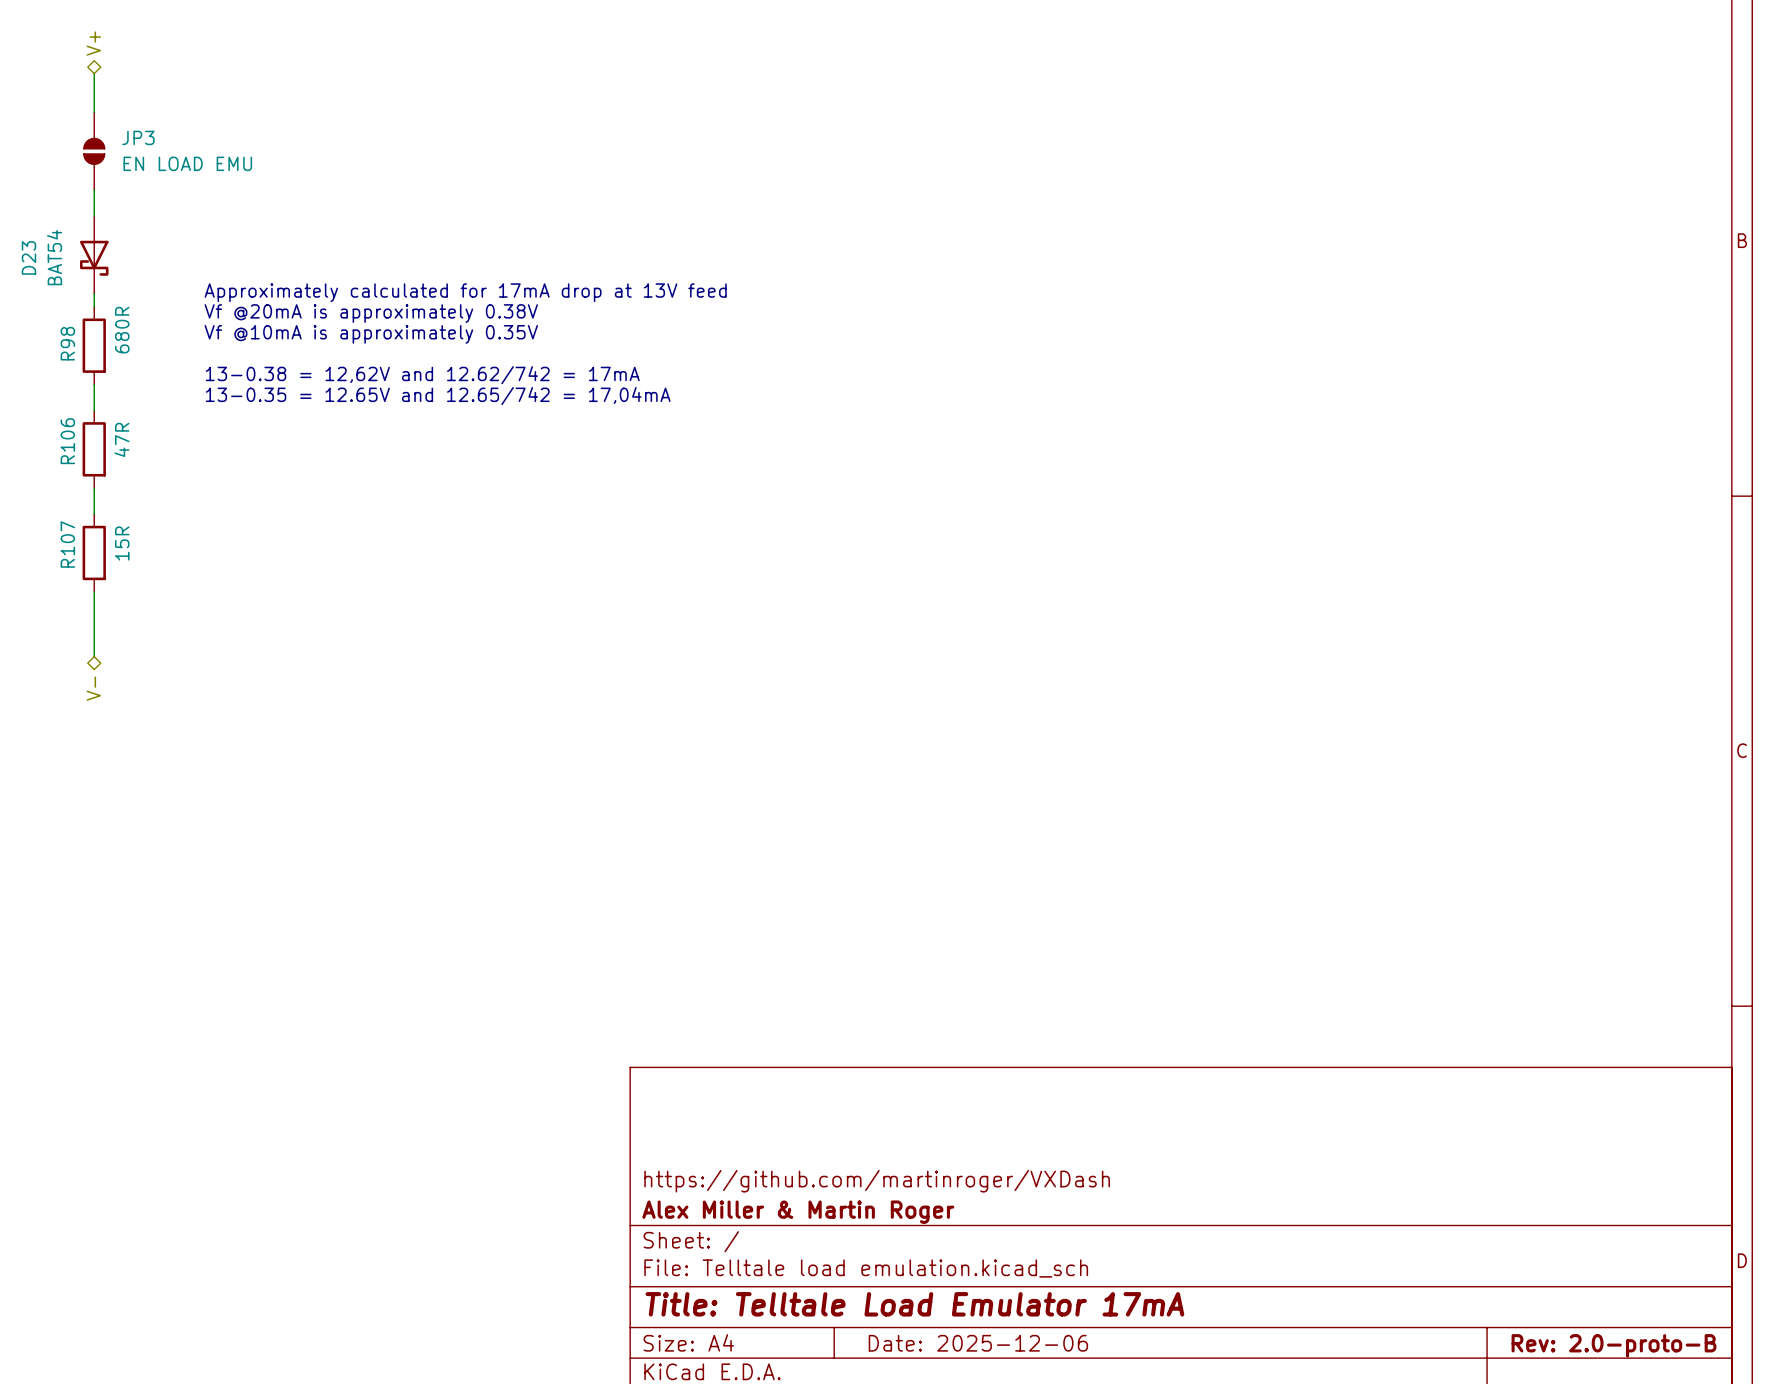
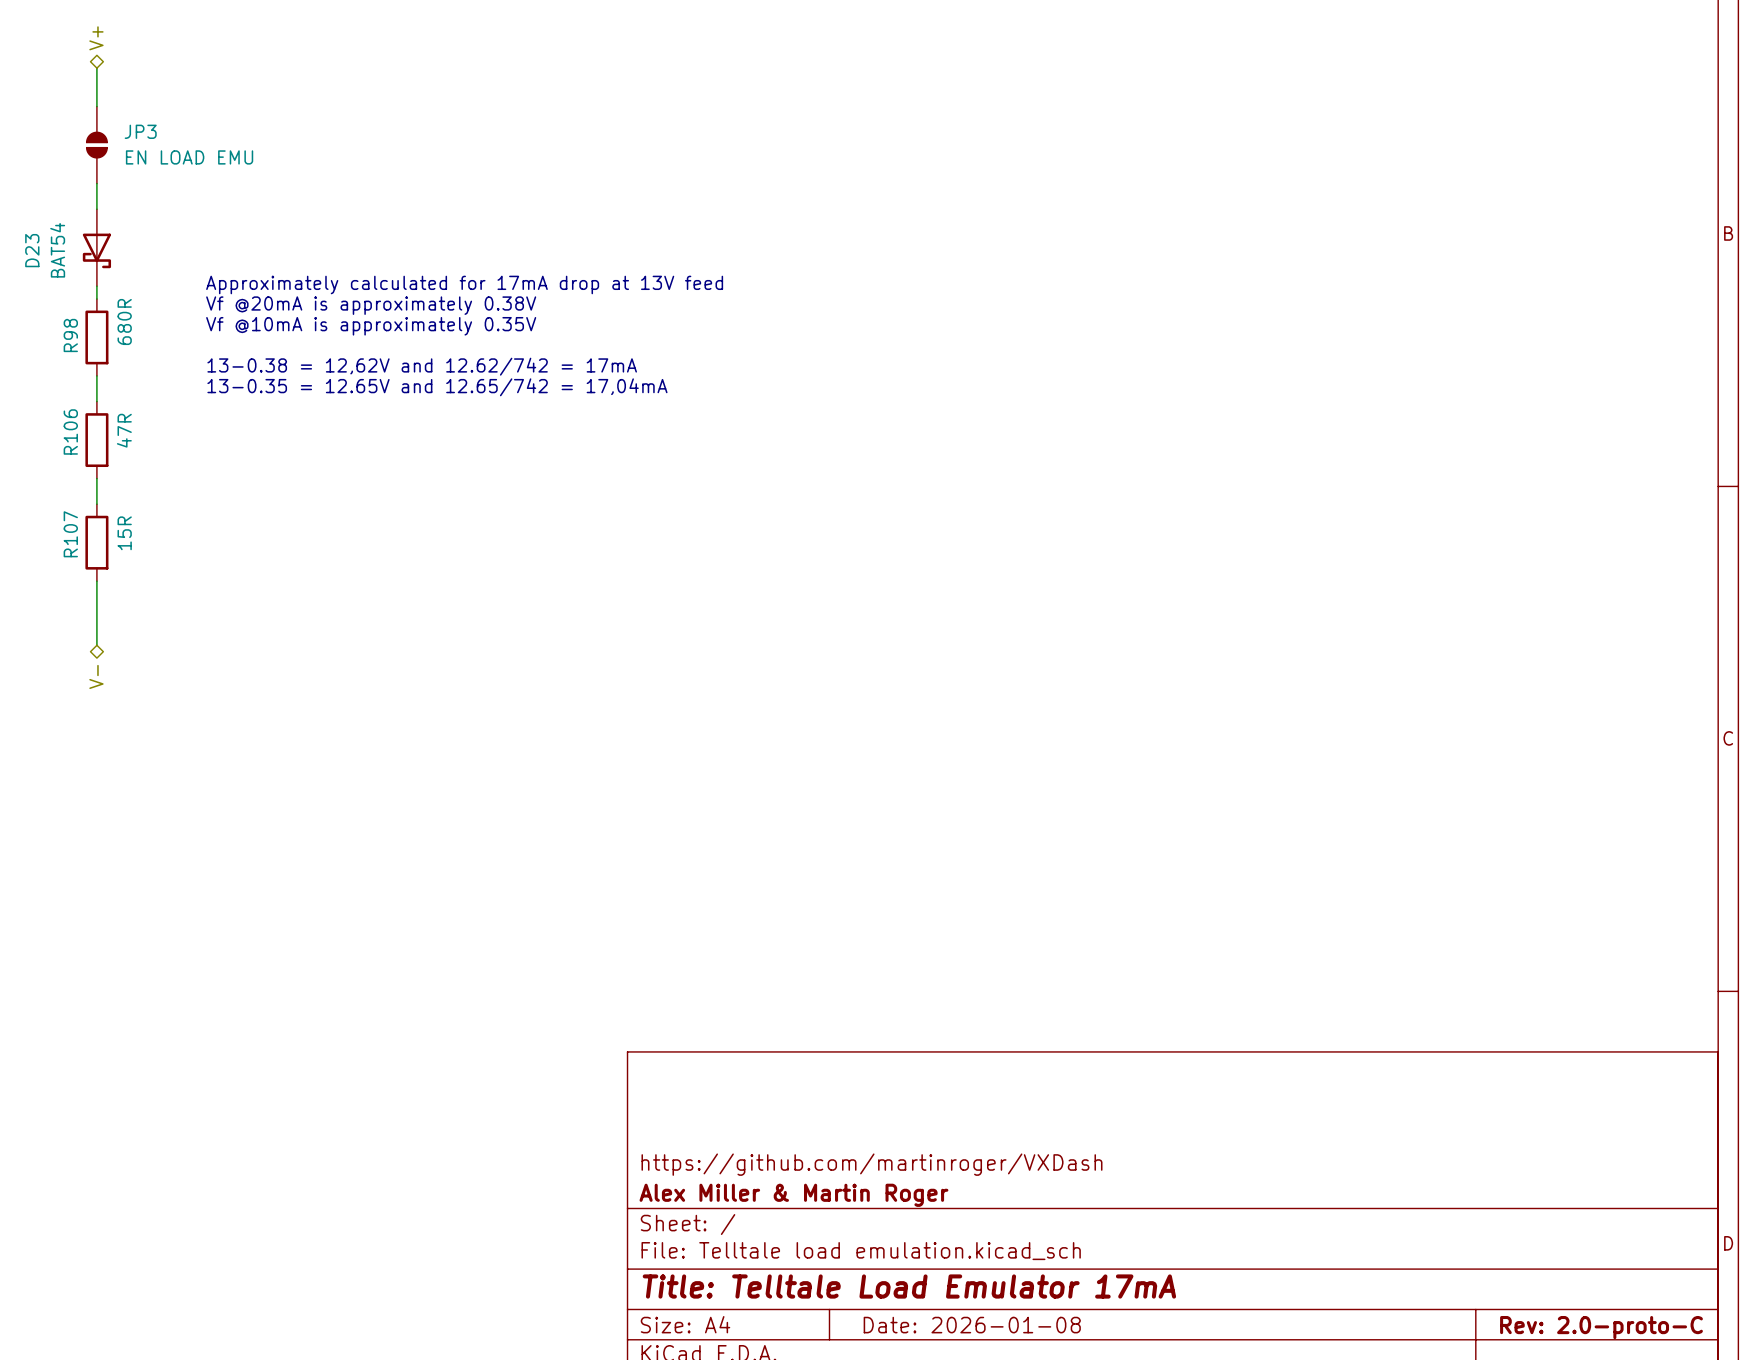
title block: Date: 2025-12-06 (978, 1343) -> Date: 2026-01-08 (972, 1325)
title block: Rev: 2.0-proto-B (1614, 1345) -> Rev: 2.0-proto-C (1601, 1327)

